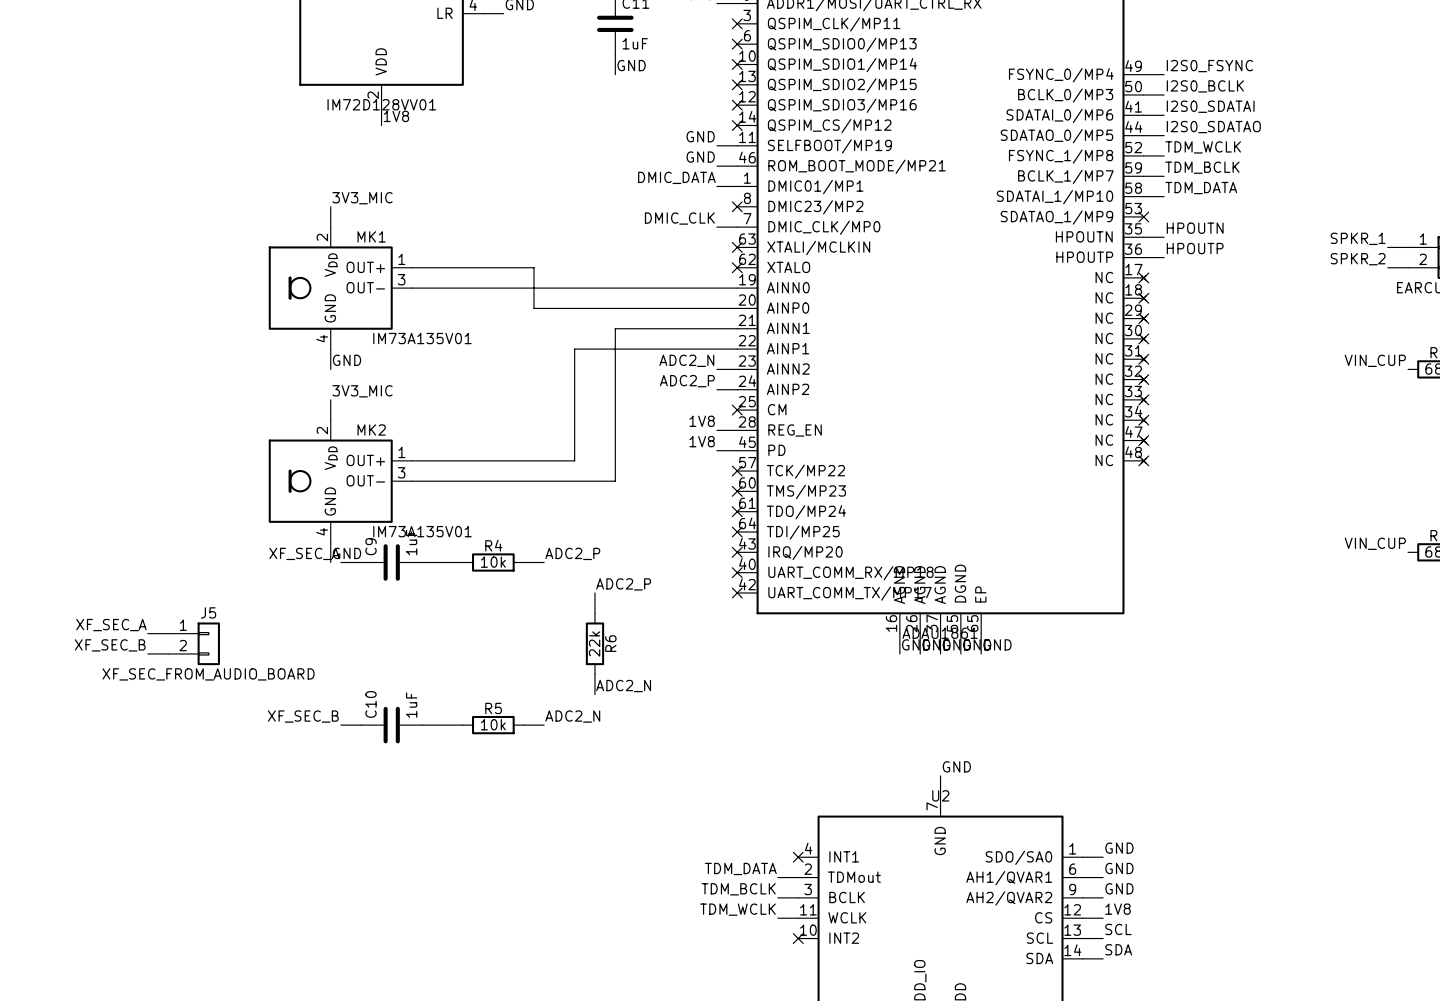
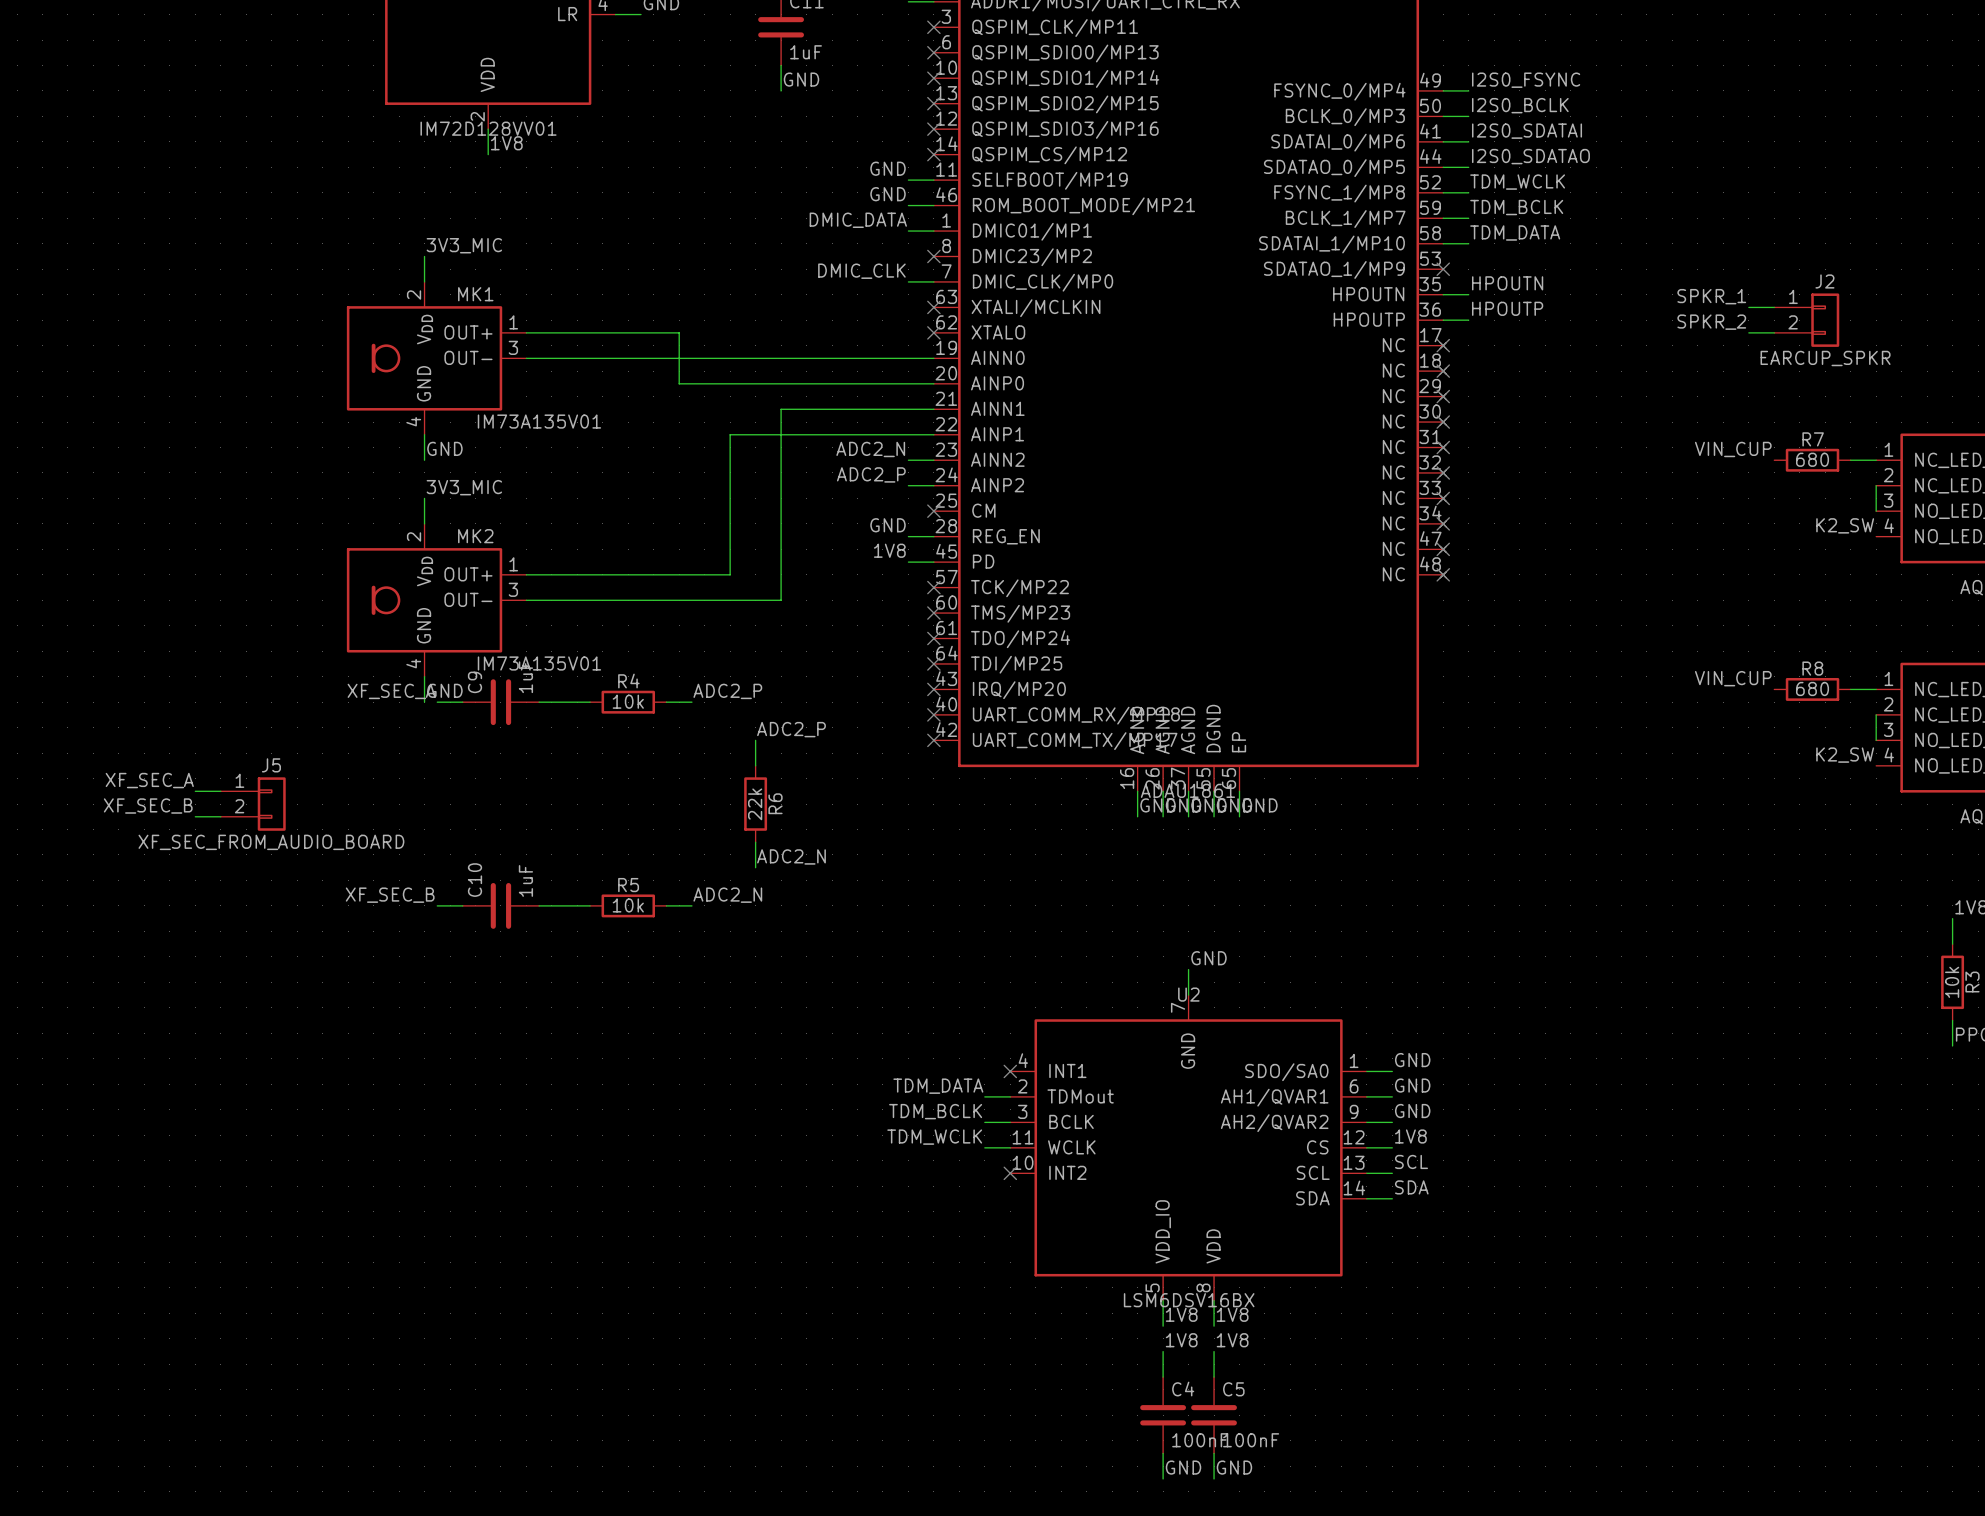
label: 1V8 (702, 421) -> GND (888, 525)

